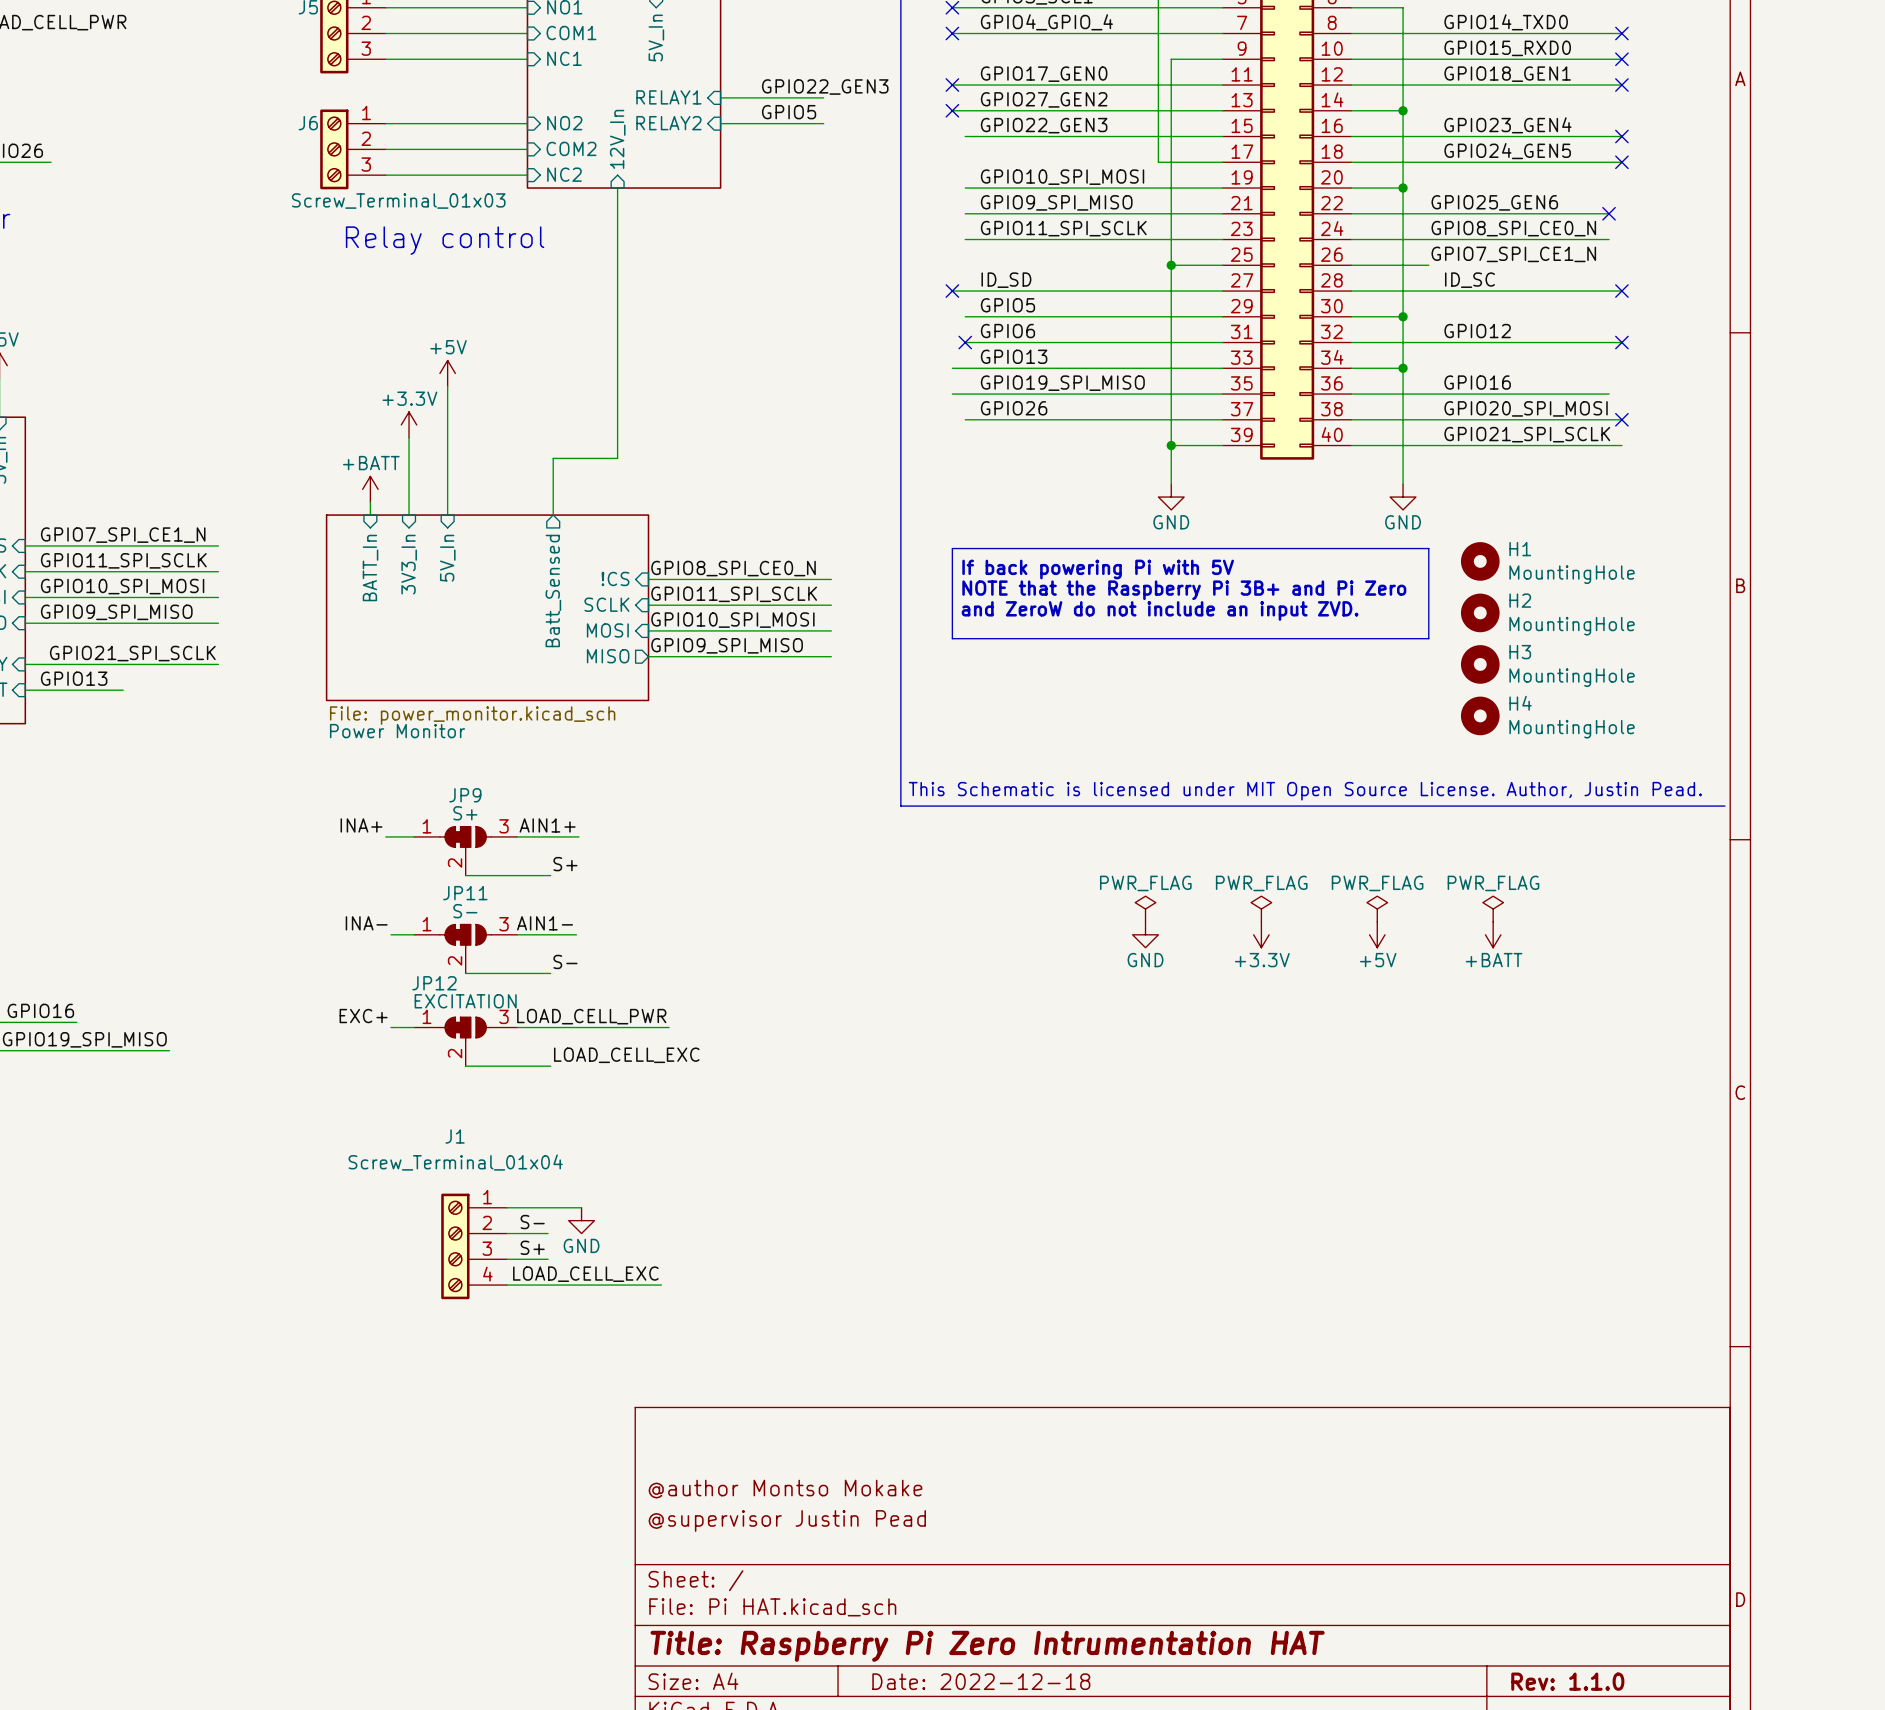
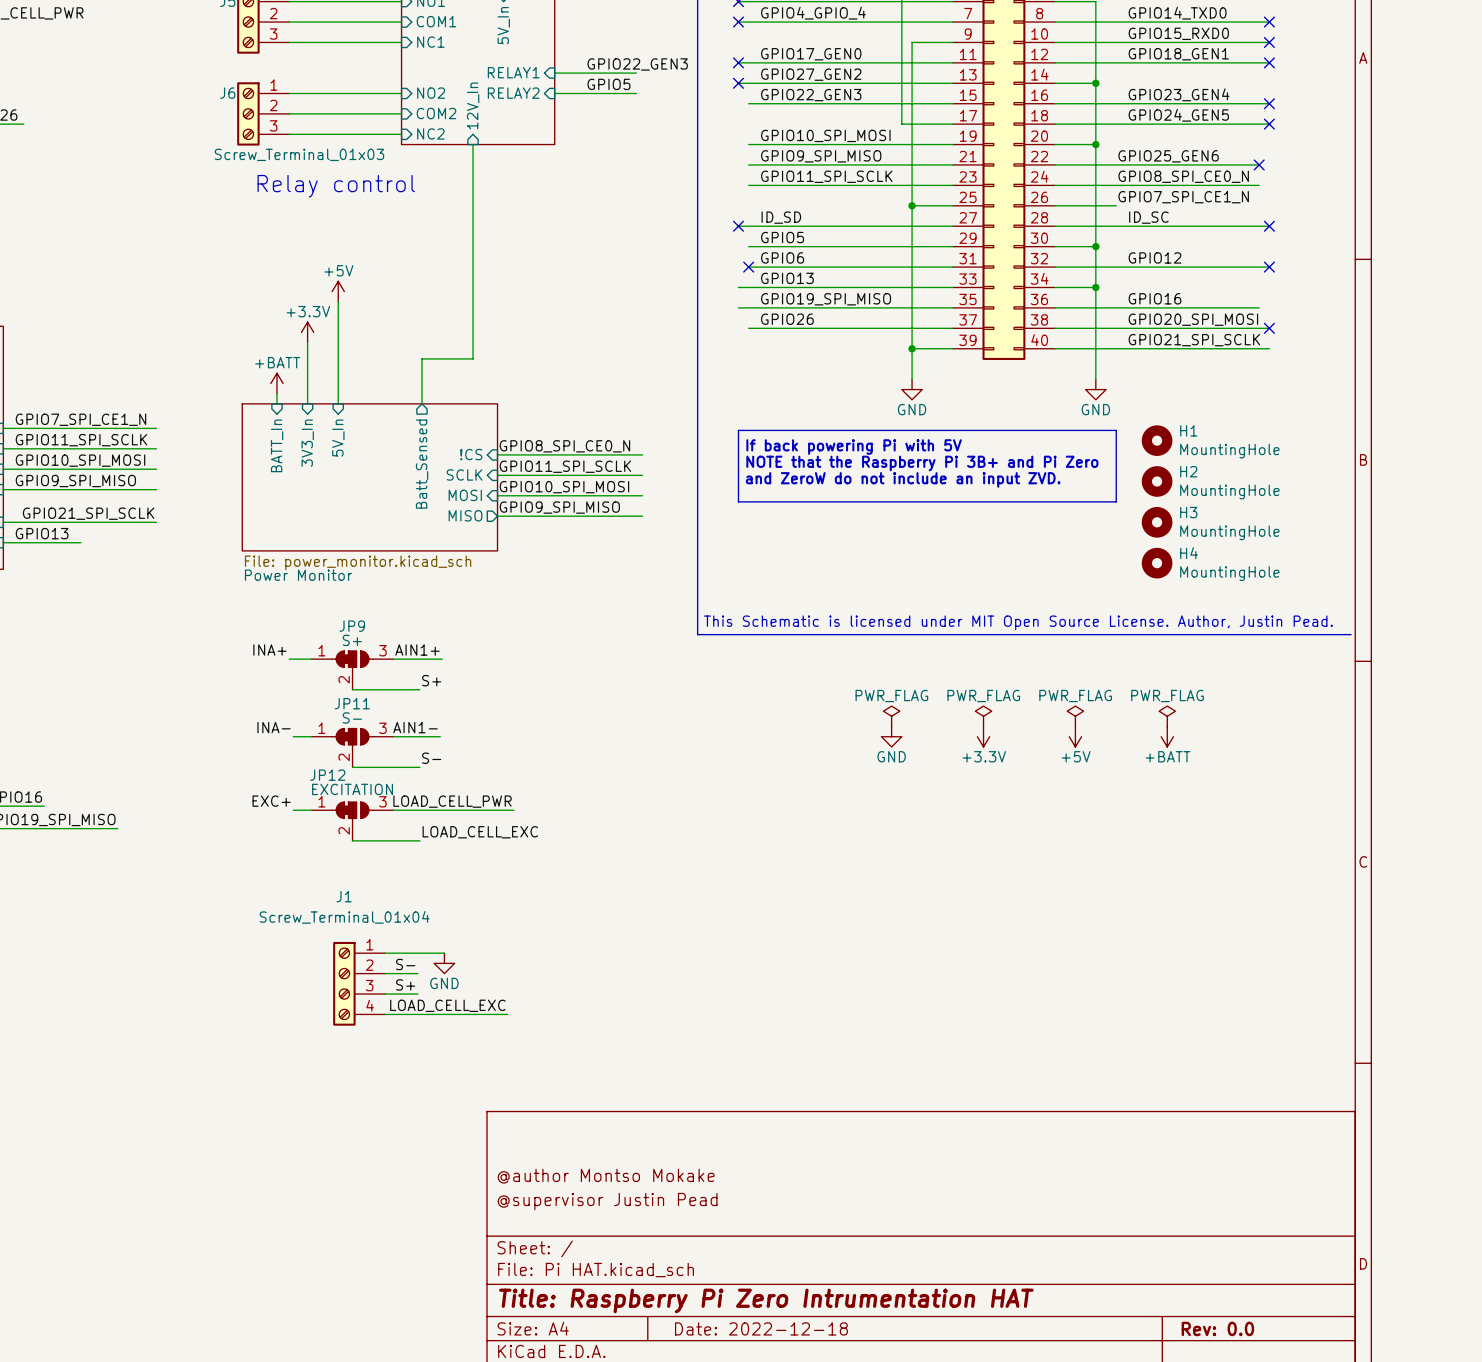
title block: Rev: 1.1.0 (1567, 1681) -> Rev: 0.0 (1217, 1328)

